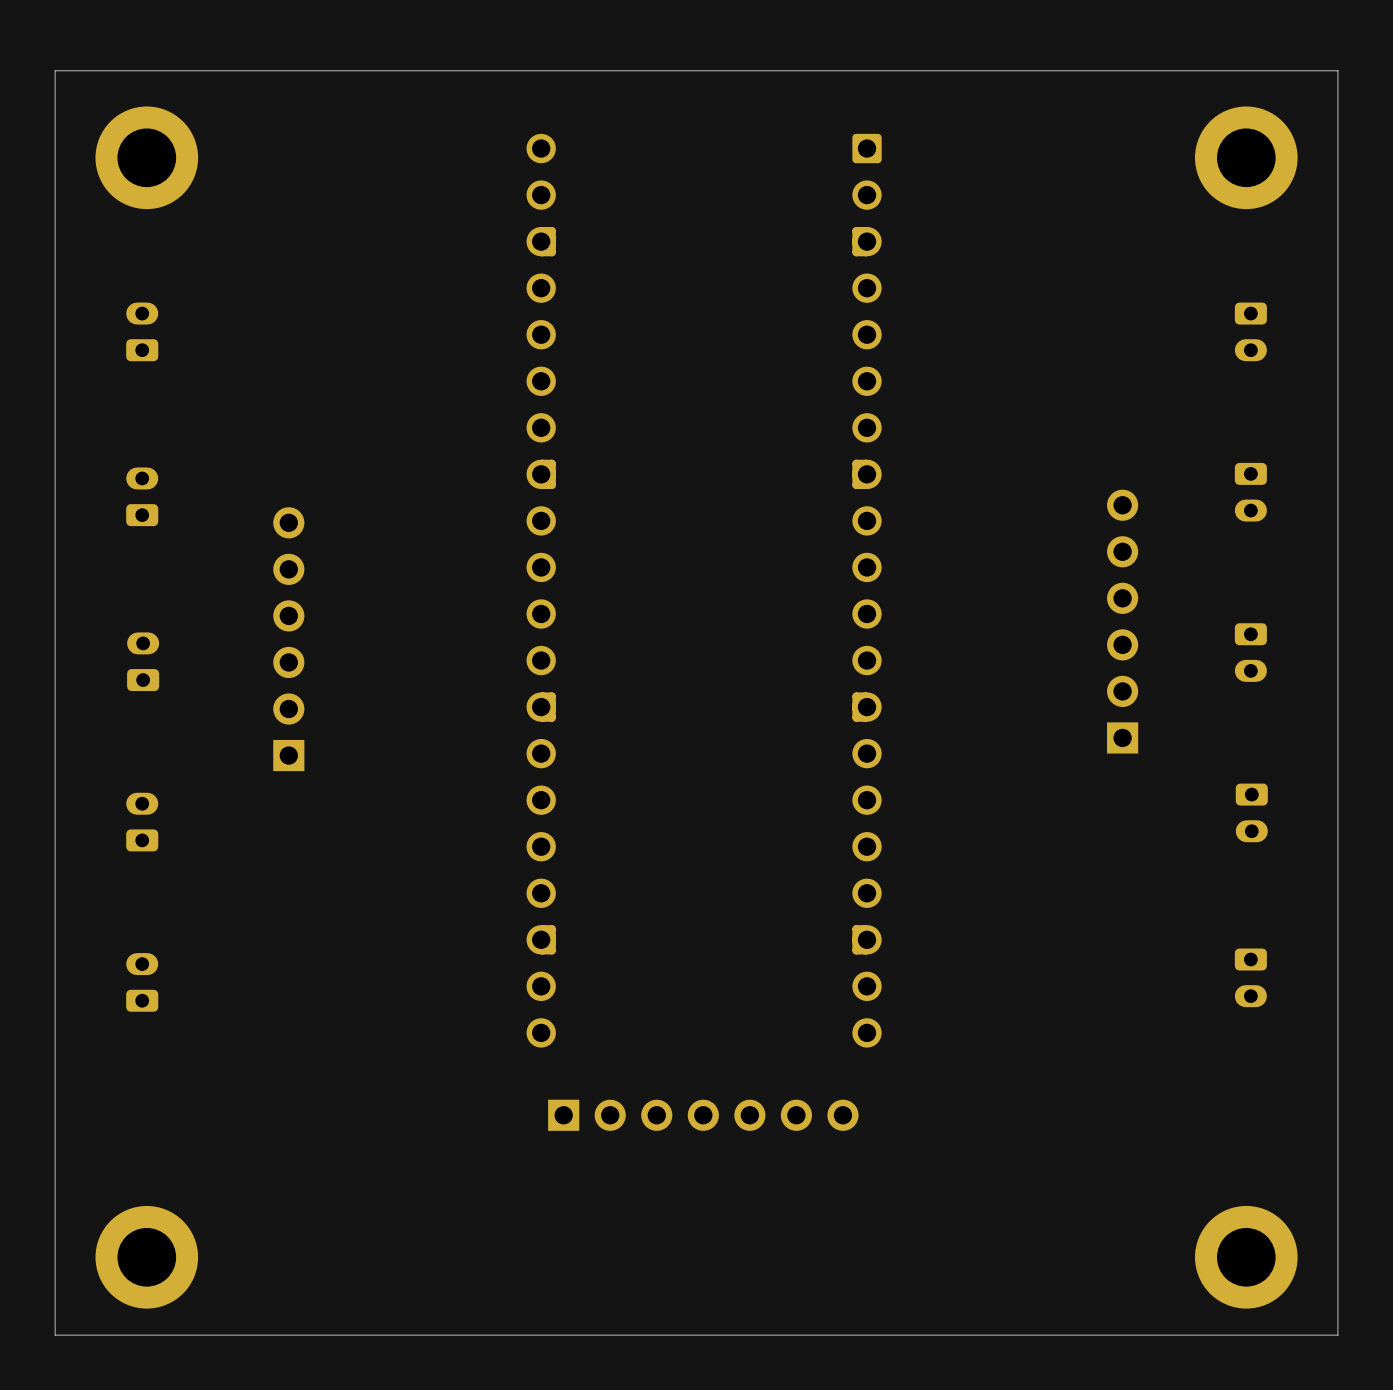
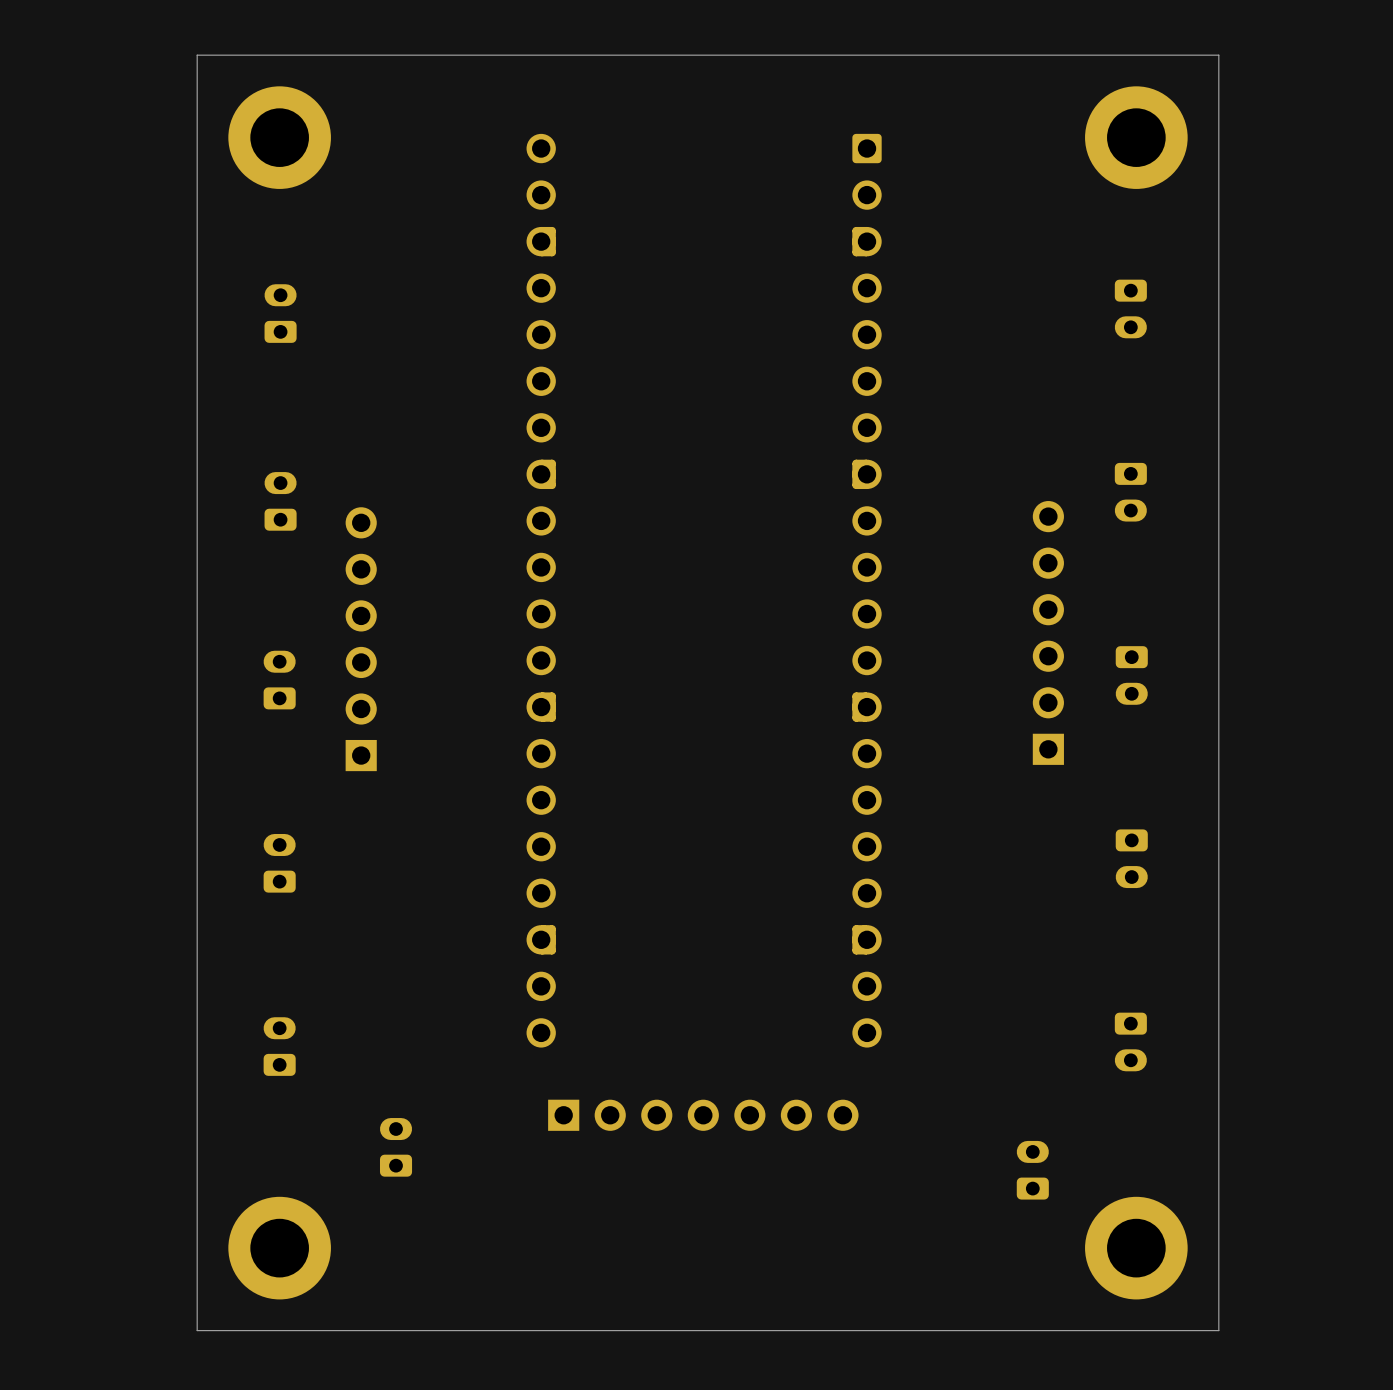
board edge: (1337, 70) (55, 70) (55, 1335) (1337, 1335) (1337, 70) -> (1218, 55) (1218, 1330) (197, 1330) (197, 55) (1218, 55)
part position: (146, 157) -> (279, 137)
part position: (1246, 157) -> (1136, 137)
part: none -> (1130, 308)
part: none -> (280, 313)
part: (142, 331) -> none
part: (1250, 331) -> none
part: none -> (1130, 492)
part: (1250, 492) -> none
part: (142, 496) -> none
part: none -> (280, 501)
part position: (1122, 621) -> (1048, 632)
part position: (288, 639) -> (361, 639)
part: (1250, 652) -> none
part: (143, 661) -> none
part: none -> (1131, 675)
part: none -> (279, 680)
part: (1251, 812) -> none
part: (142, 822) -> none
part: none -> (1131, 858)
part: none -> (279, 863)
part: (1250, 977) -> none
part: (142, 982) -> none
part: none -> (1130, 1041)
part: none -> (279, 1046)
part: none -> (396, 1147)
part: none -> (1032, 1170)
part position: (146, 1257) -> (279, 1248)
part position: (1246, 1257) -> (1136, 1248)

